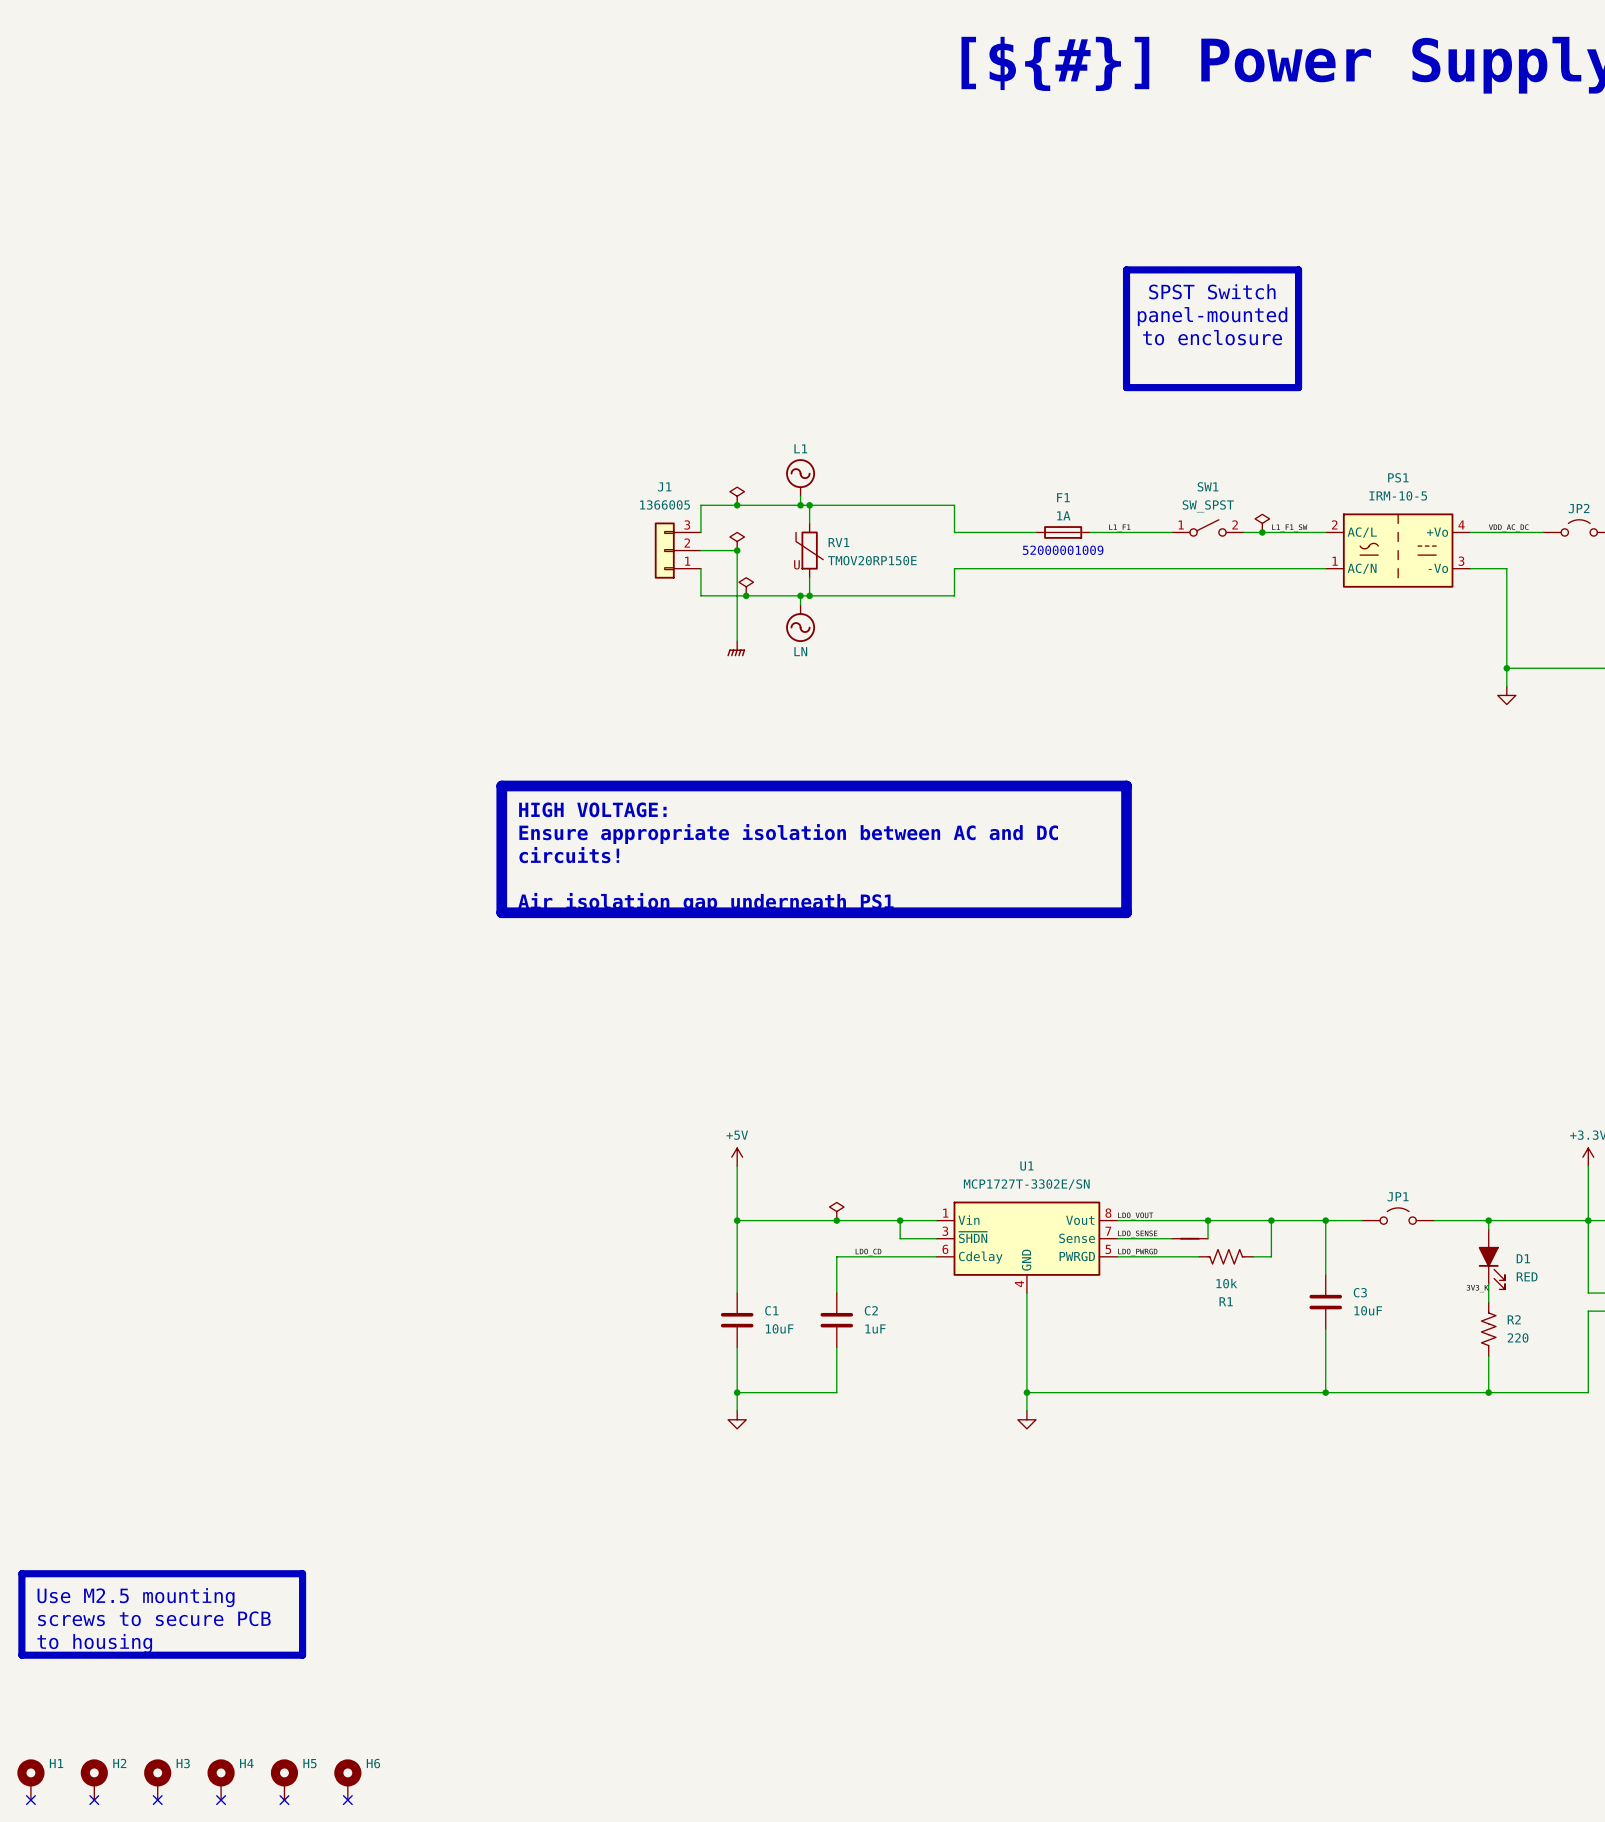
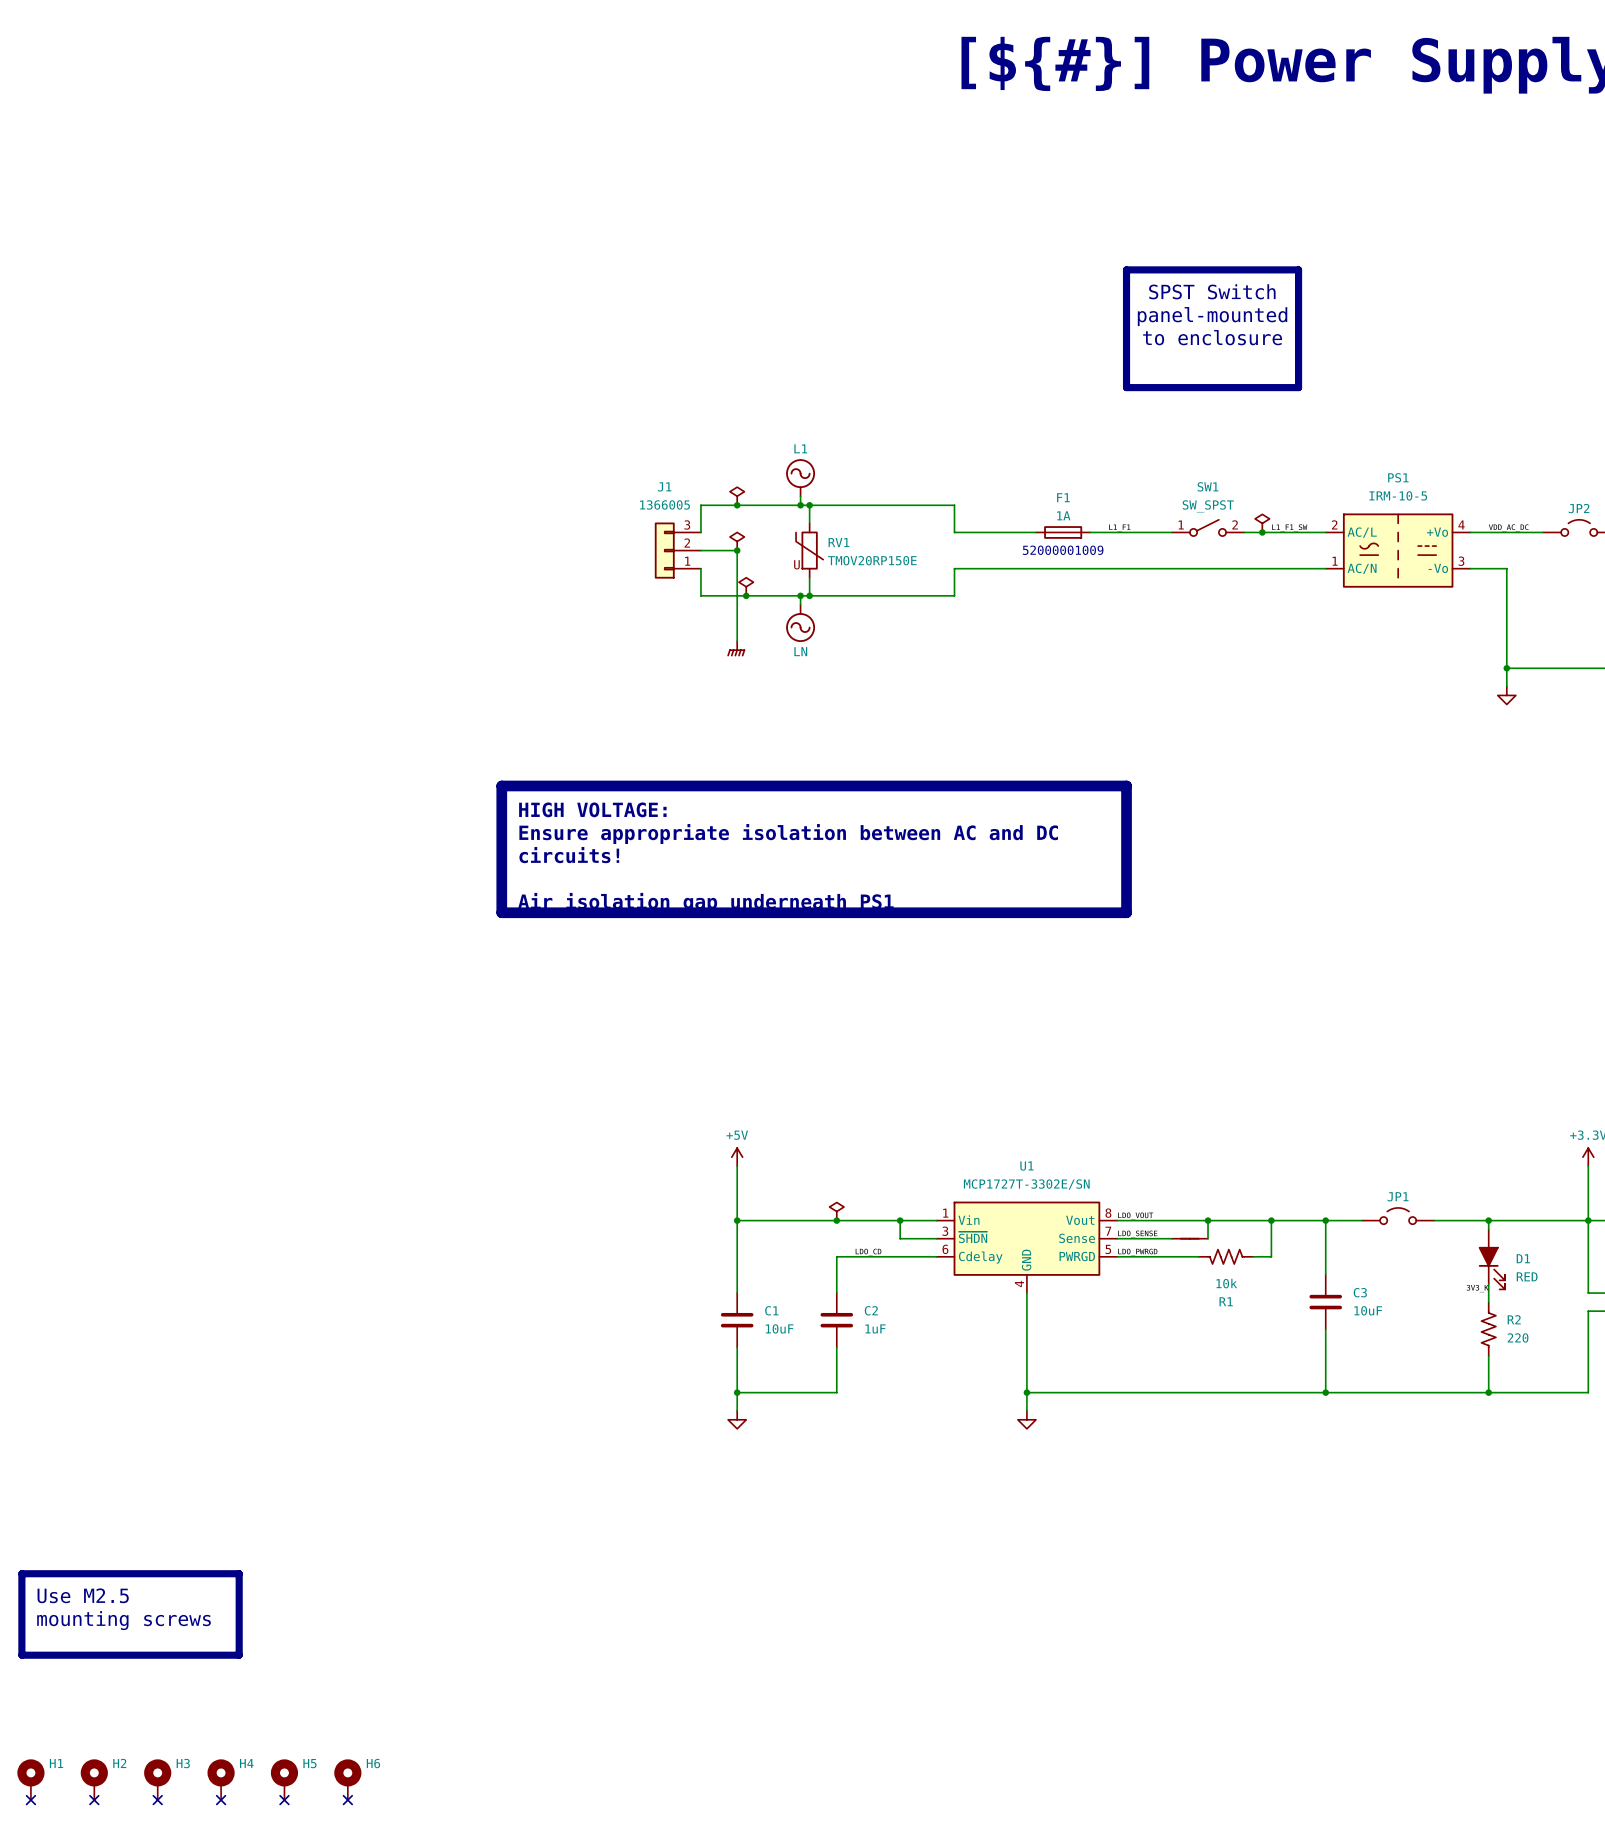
line: (239, 1573) (302, 1573) (302, 1655) (239, 1655) -> (239, 1573) (239, 1655)
text: Use M2.5 mounting (136, 1597) -> Use M2.5 (83, 1595)
text: screws to secure PCB (154, 1618) -> mounting screws (124, 1620)
text: to housing (94, 1643) -> none

